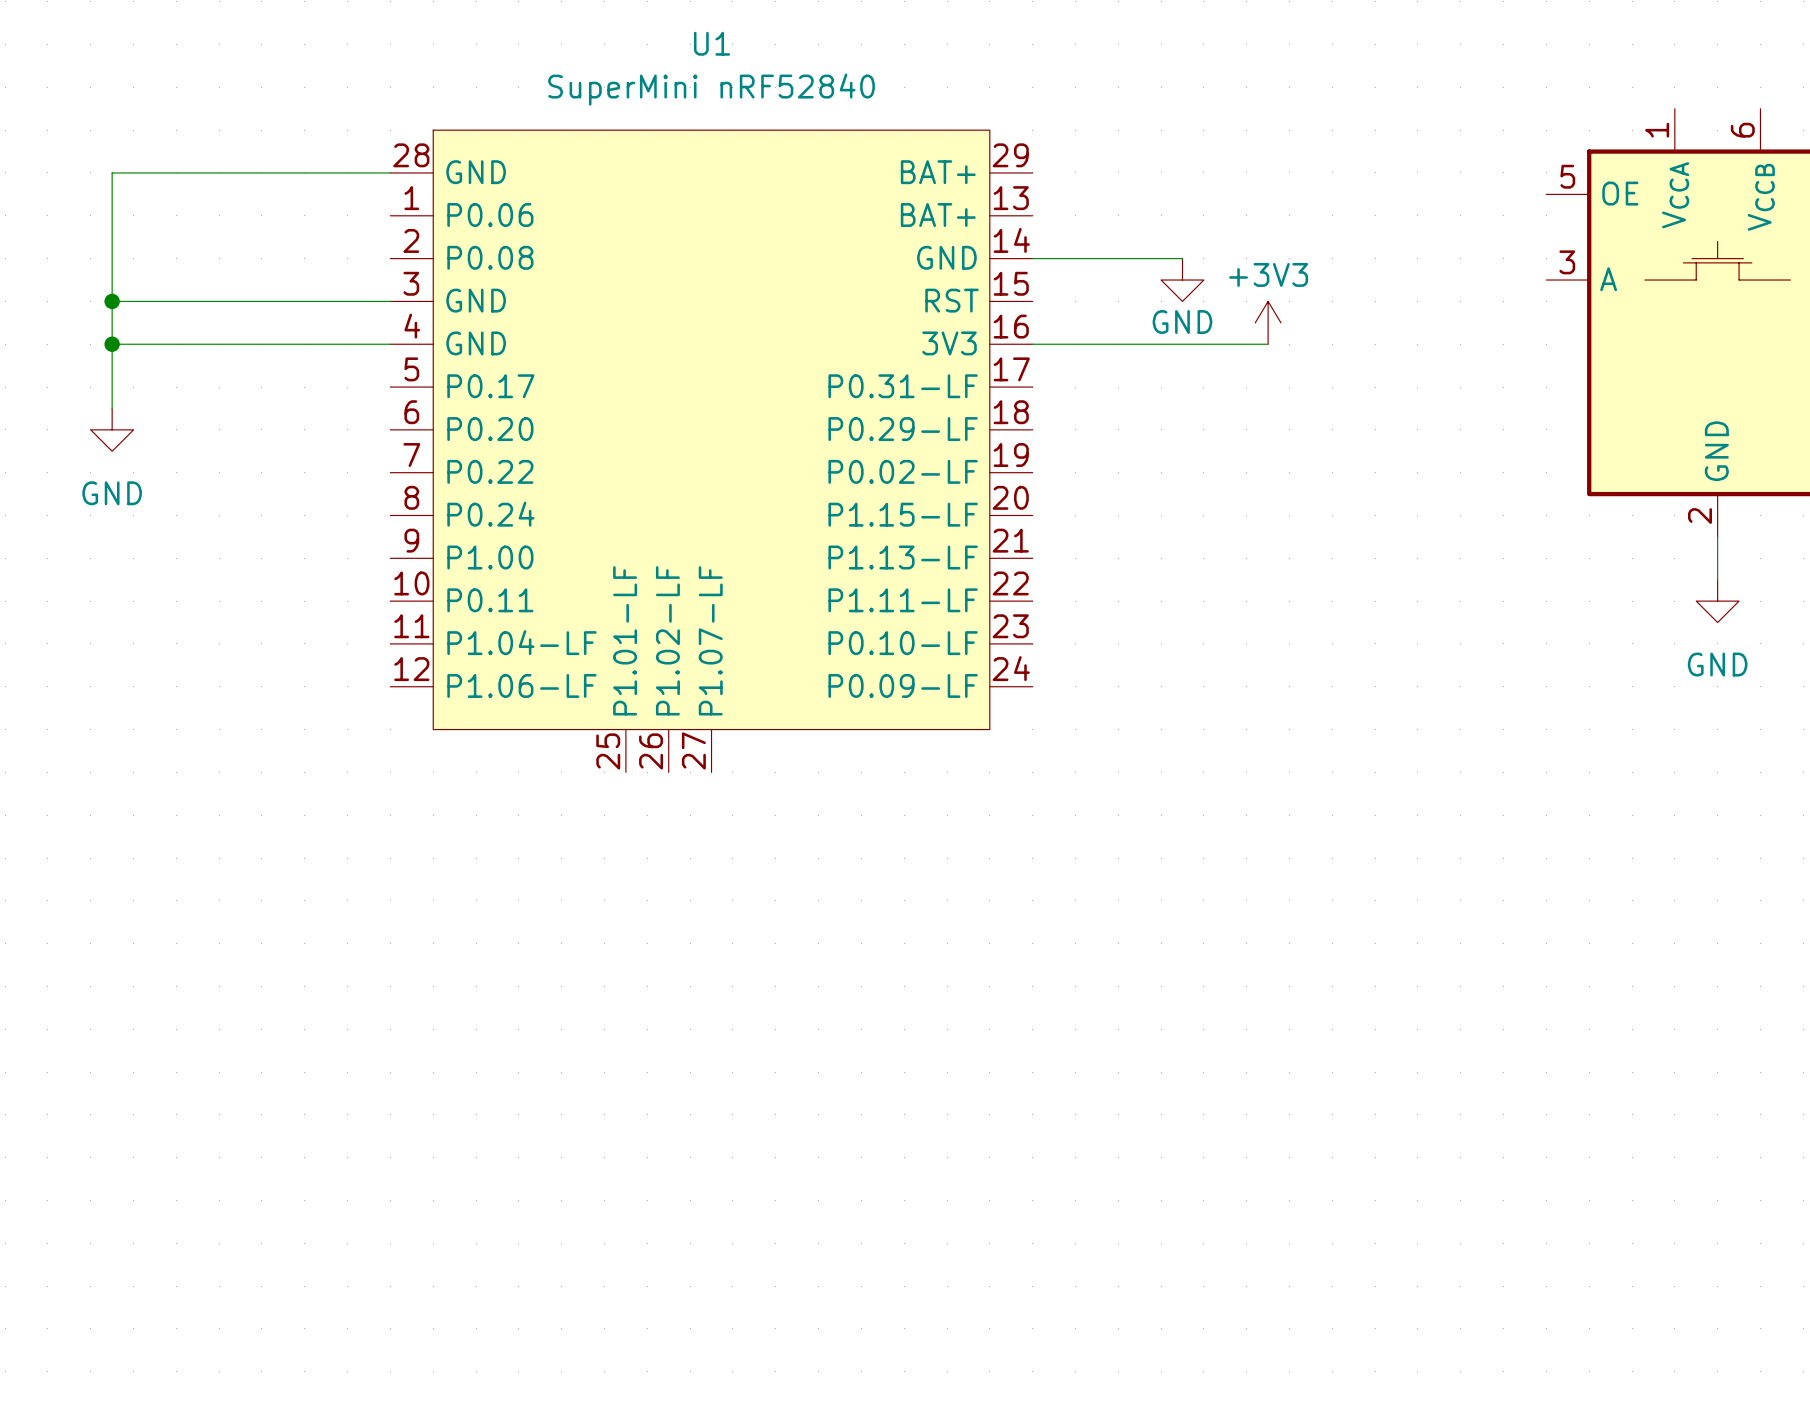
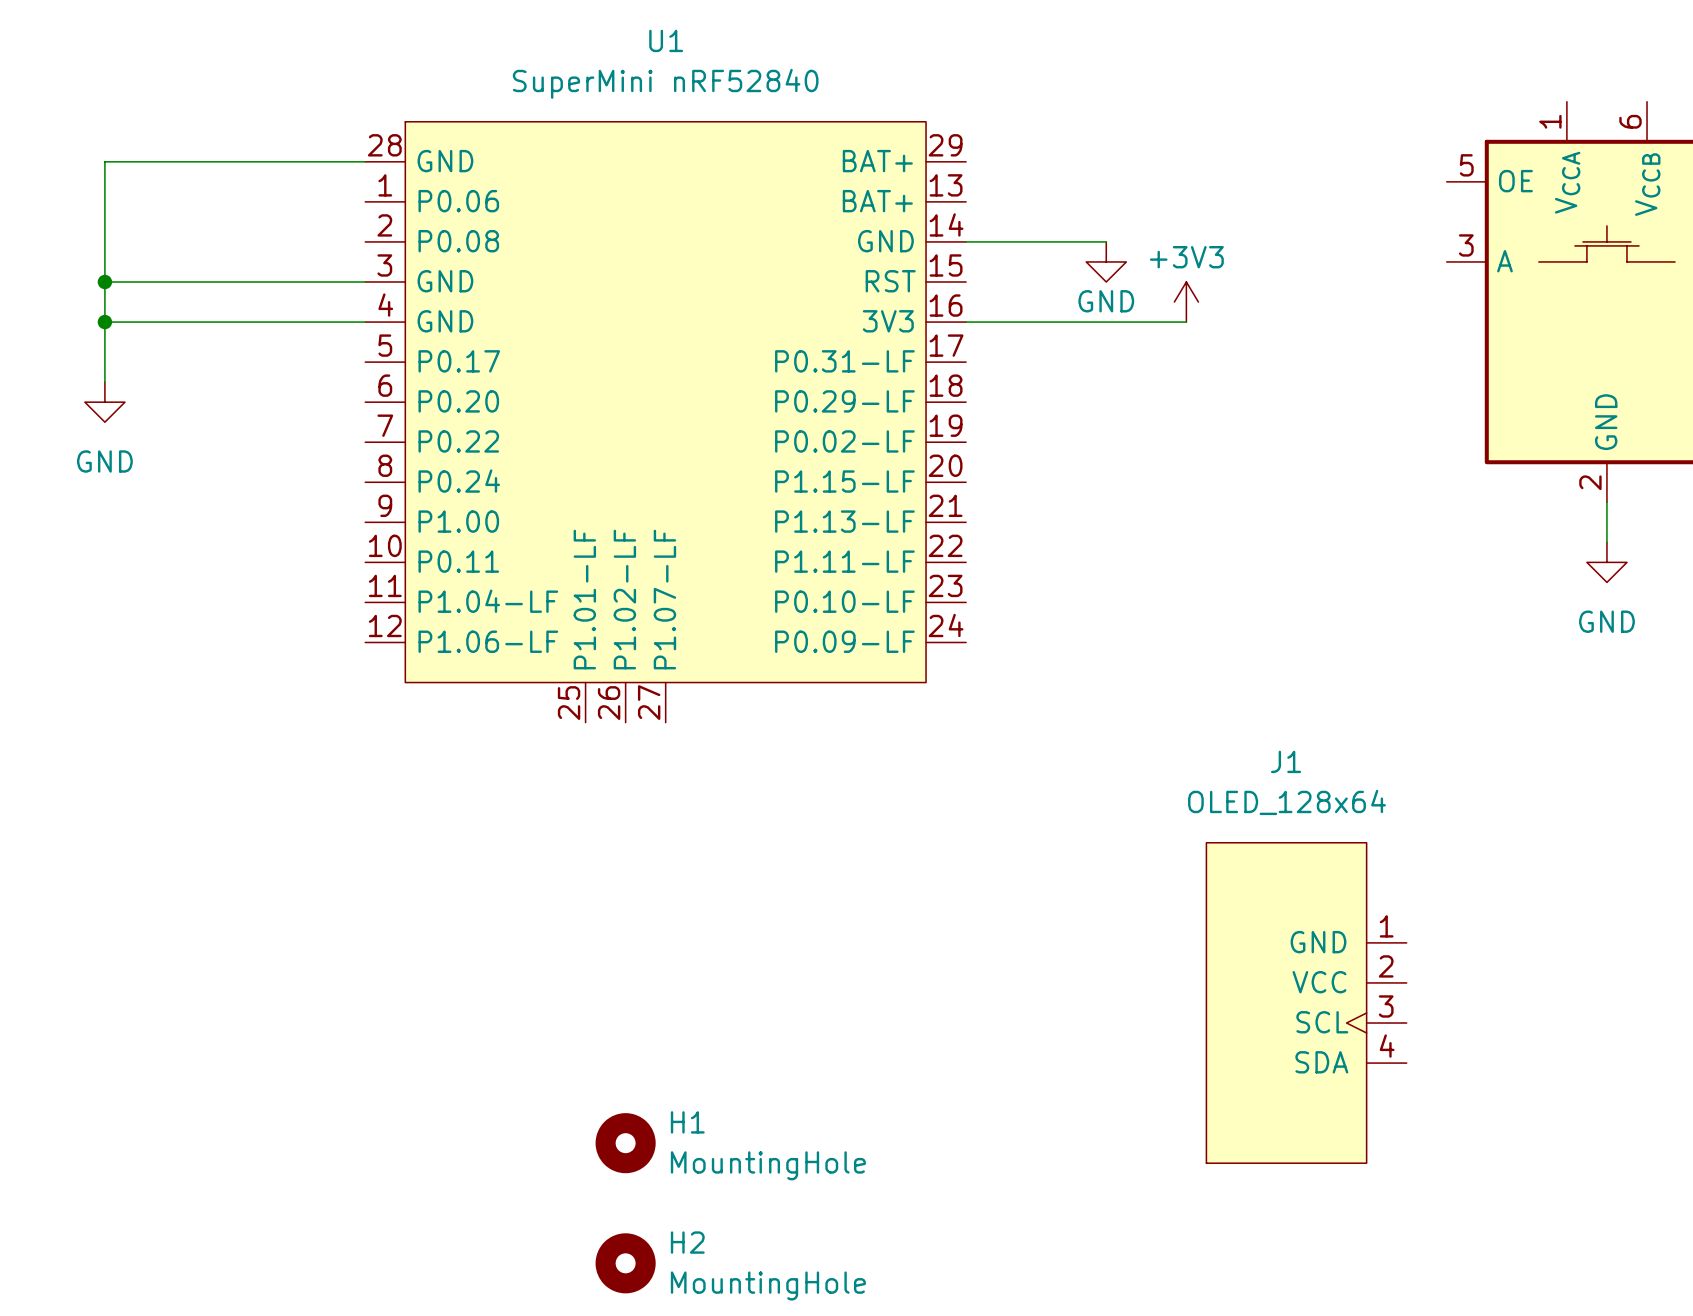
J1: none -> OLED_128x64 (1306, 1002)
H1: none -> MountingHole (625, 1143)
H2: none -> MountingHole (625, 1263)

